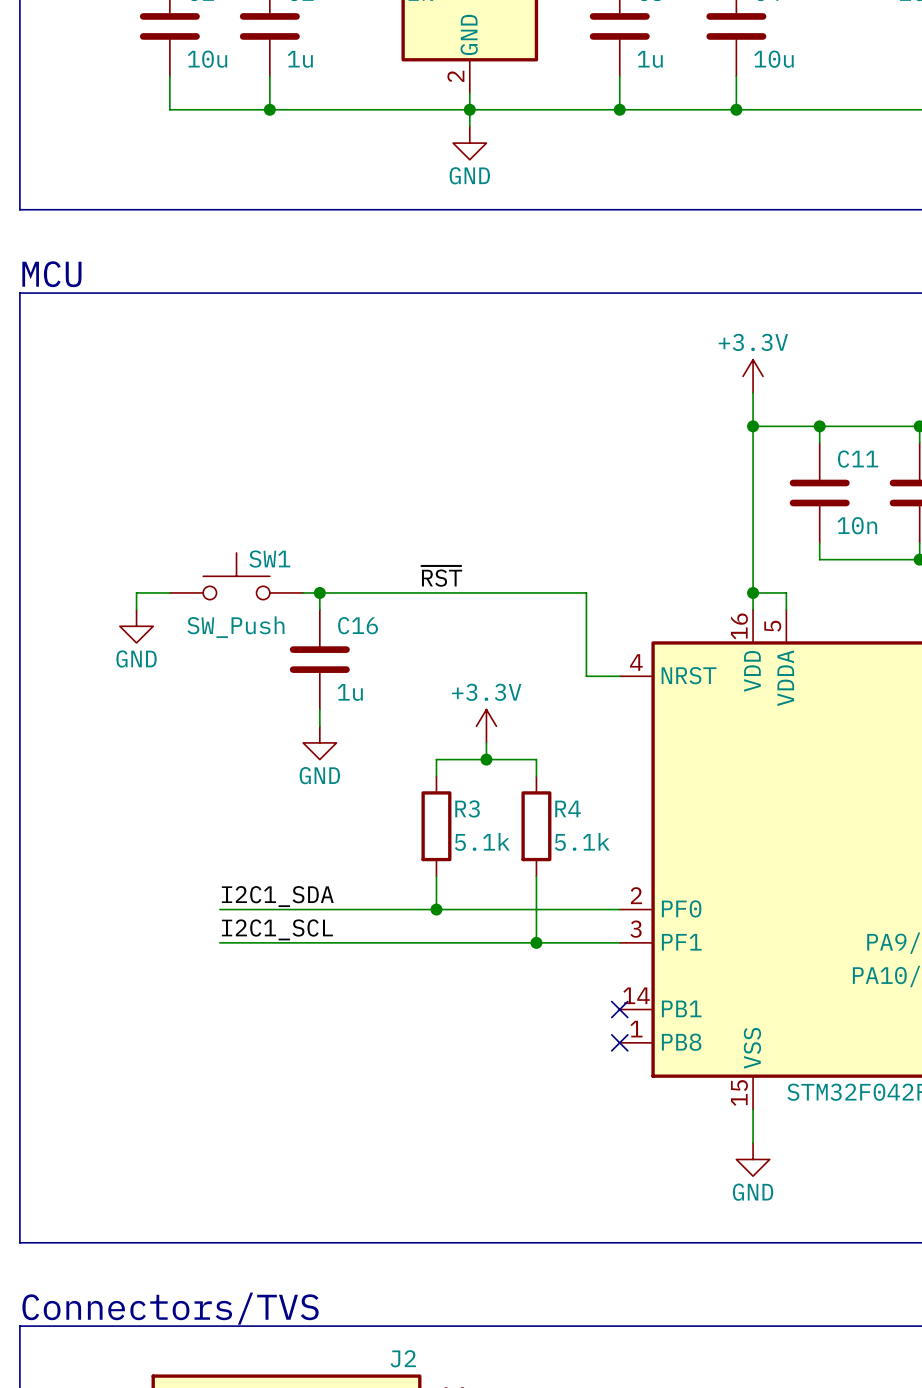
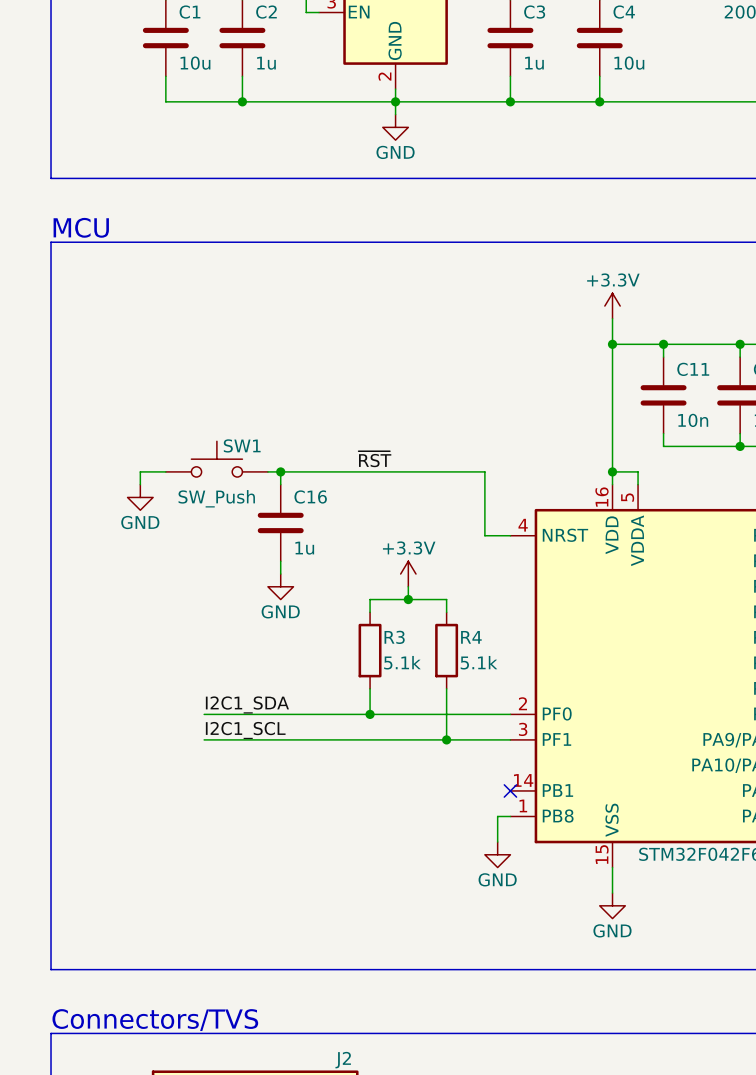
wire: none -> (510, 816) (497, 816) (497, 842)
no-connect mark: (619, 1042) -> none
power symbol: none -> GND (497, 854)

